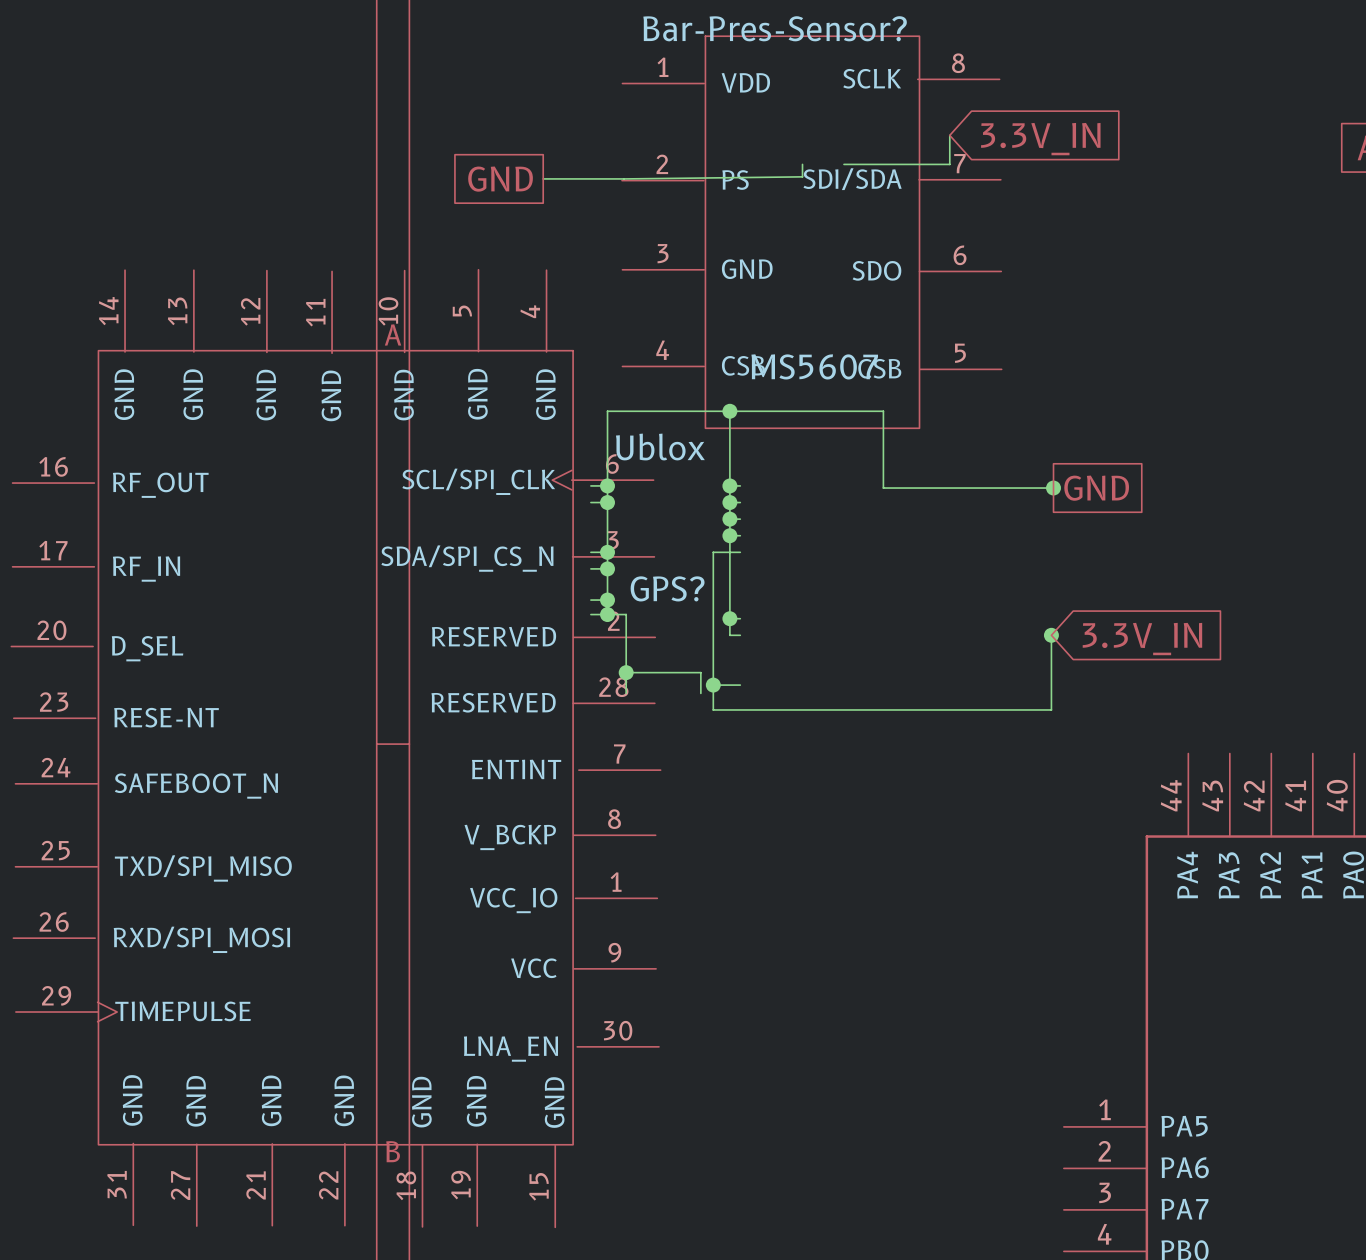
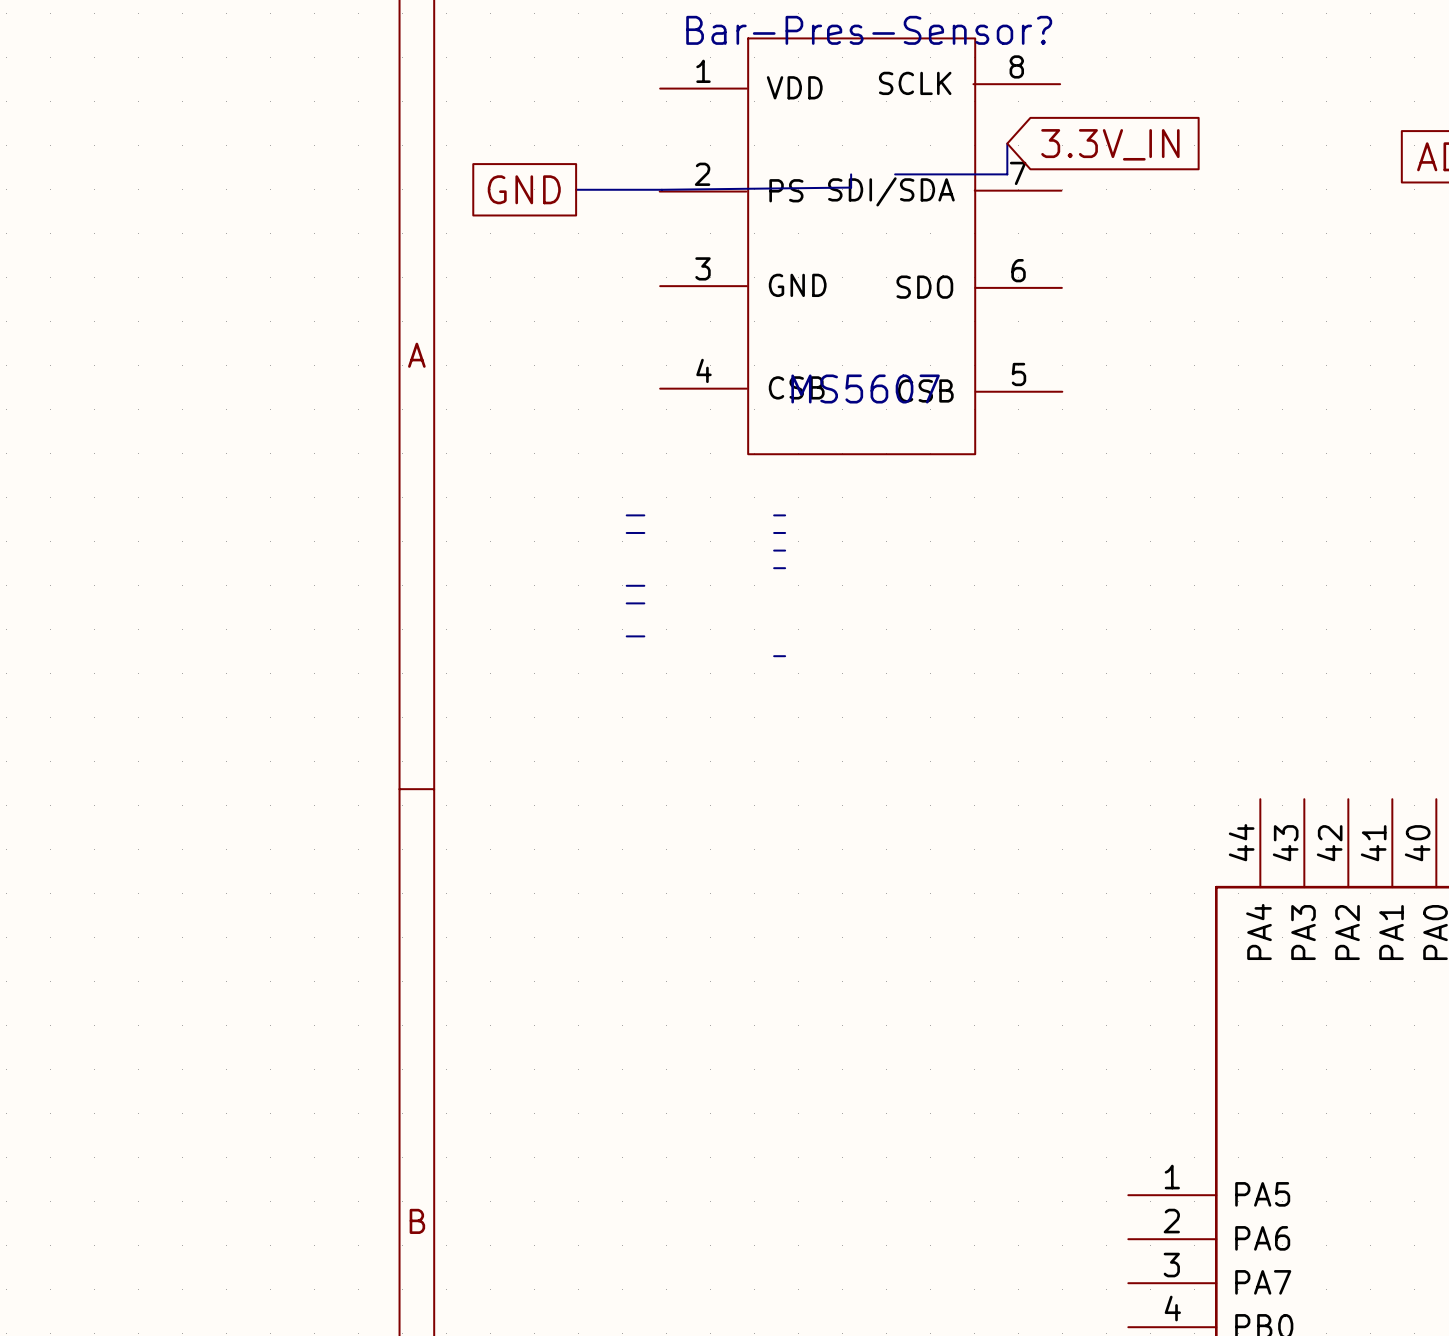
wire: (729, 411) (729, 635) (740, 635) -> none
junction: (729, 411) -> none
junction: (607, 485) -> none
junction: (729, 485) -> none
wire: (1053, 488) (883, 488) (883, 411) (607, 411) (607, 614) -> none
junction: (1053, 488) -> none
global label: GND (1096, 488) -> none
junction: (607, 502) -> none
junction: (729, 502) -> none
junction: (729, 519) -> none
junction: (729, 535) -> none
junction: (607, 552) -> none
wire: (740, 552) (713, 552) (713, 709) (1051, 709) (1051, 635) -> none
junction: (607, 568) -> none
junction: (607, 600) -> none
wire: (590, 614) (626, 614) (626, 693) -> none
junction: (607, 614) -> none
junction: (729, 618) -> none
junction: (1051, 635) -> none
global label: 3.3V_IN (1142, 639) -> none
wire: (626, 672) (700, 672) (700, 693) -> none
junction: (626, 672) -> none
wire: (713, 685) (740, 685) -> none
junction: (713, 685) -> none
GPS?: Ublox (335, 748) -> none

